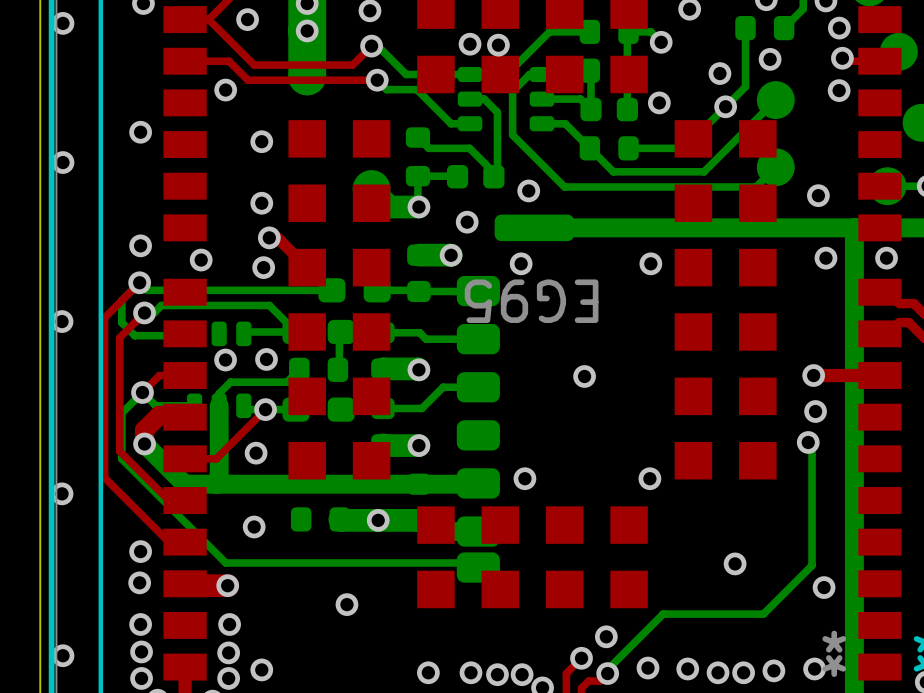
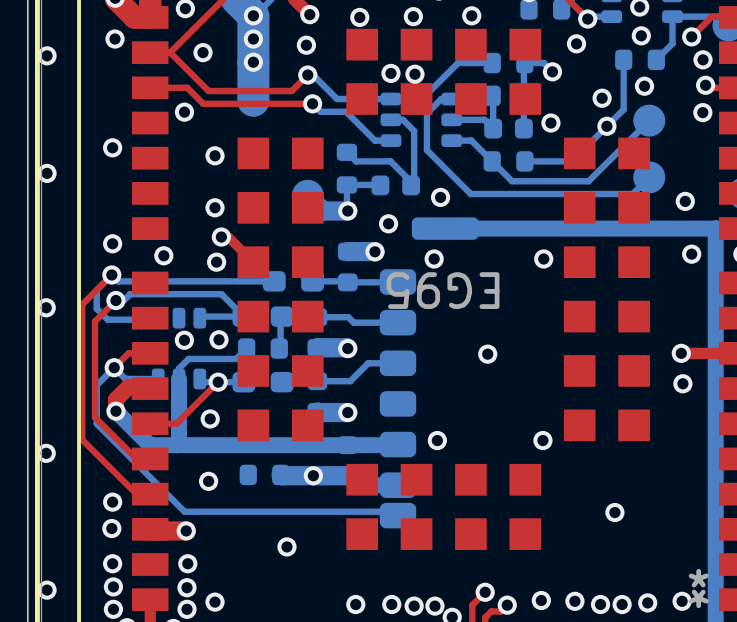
bottom track: (808, 442) (812, 446) (812, 565) (763, 614) (663, 614) (607, 669) (607, 673) -> none
via: (808, 442) -> none
via: (824, 587) -> none
via: (606, 636) -> none

